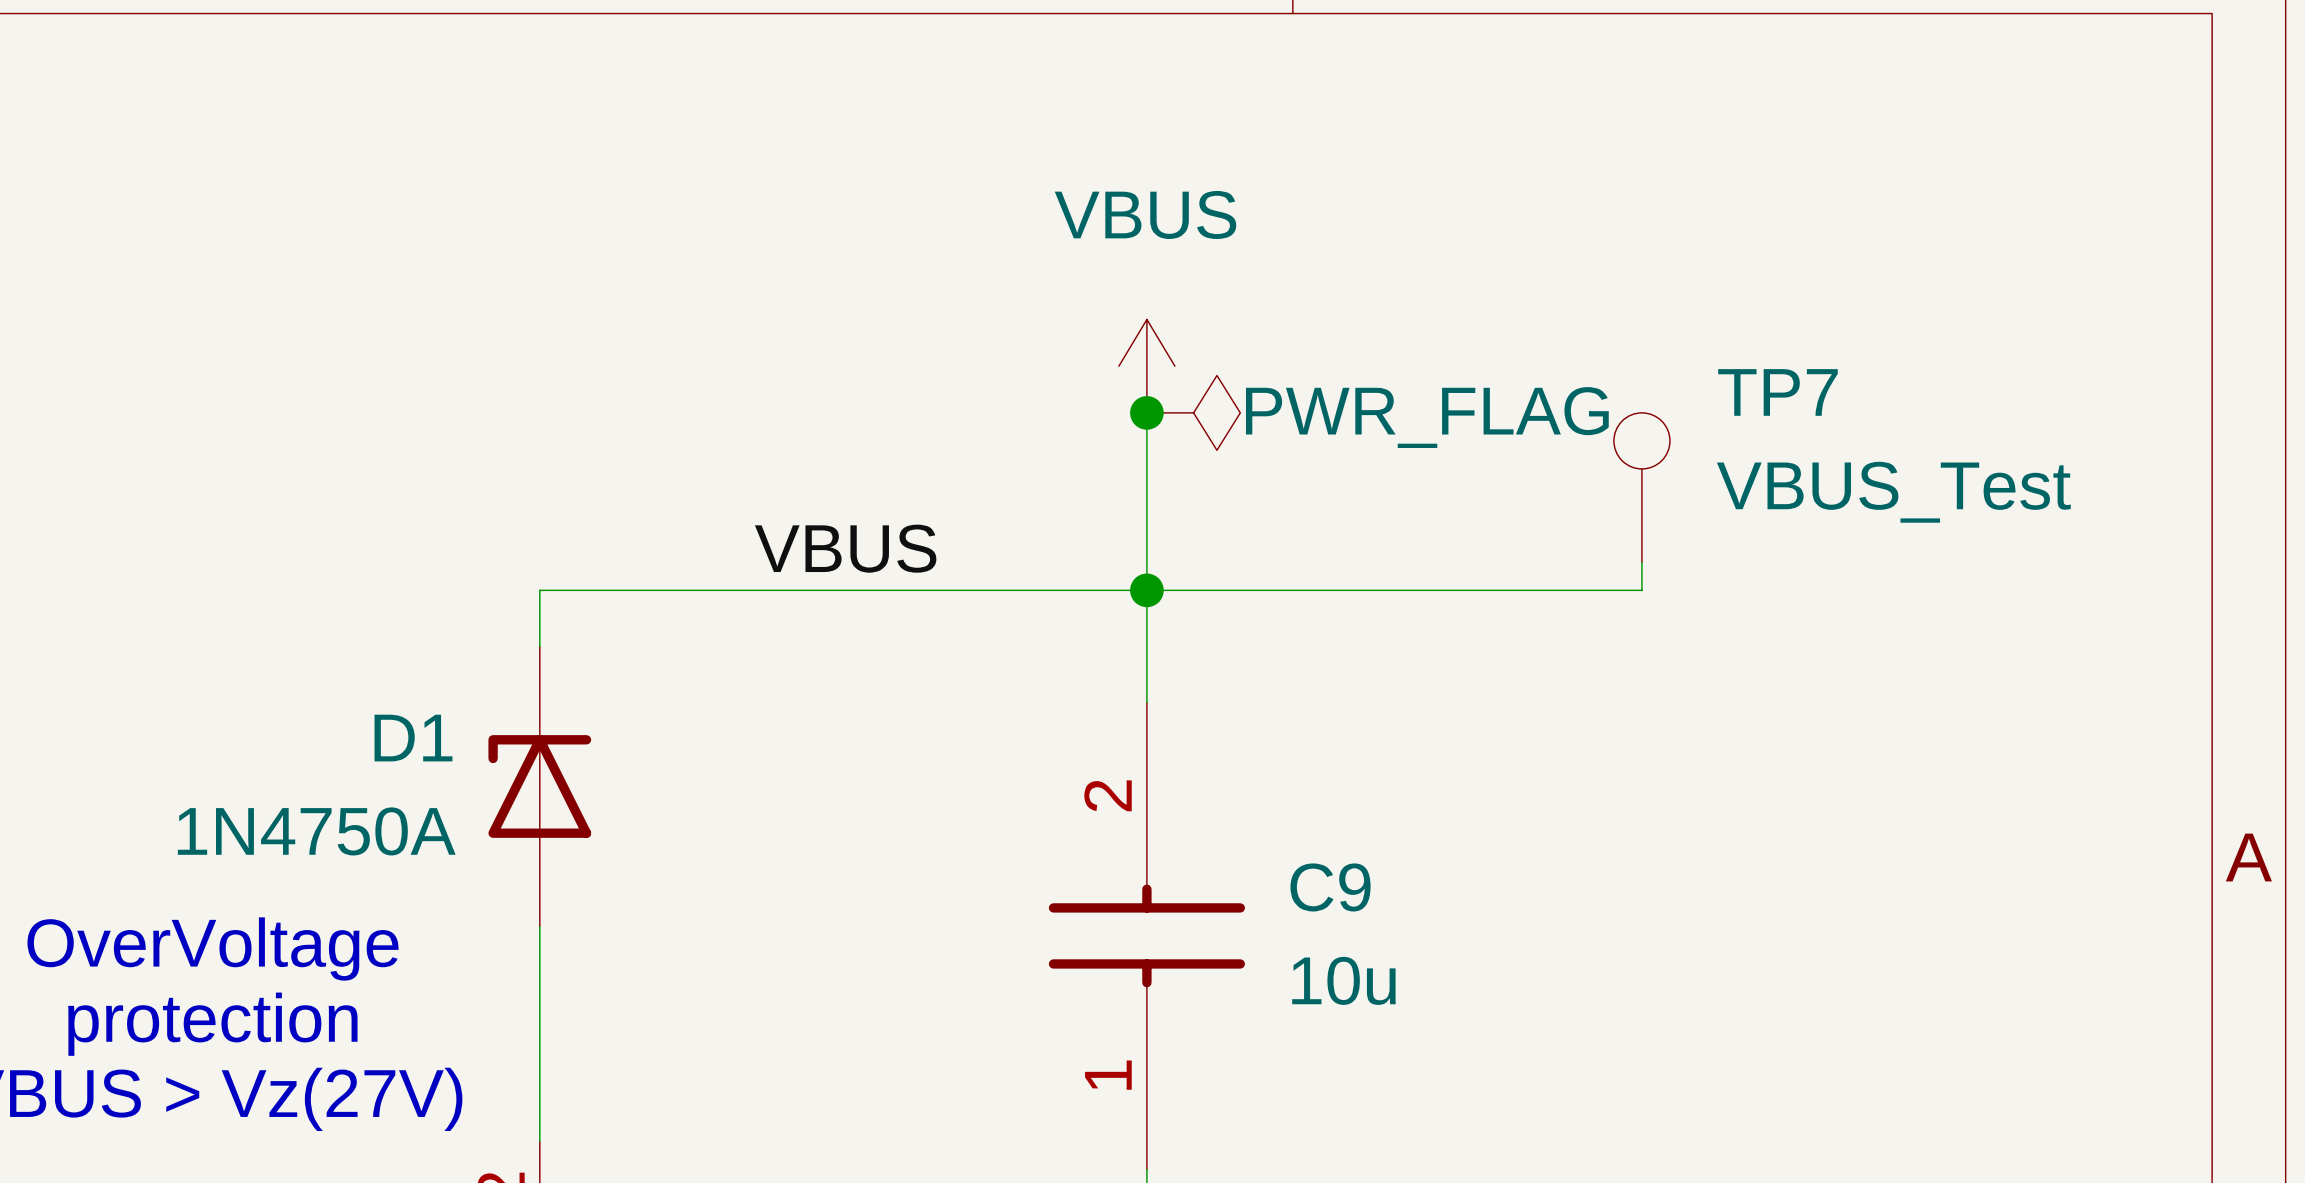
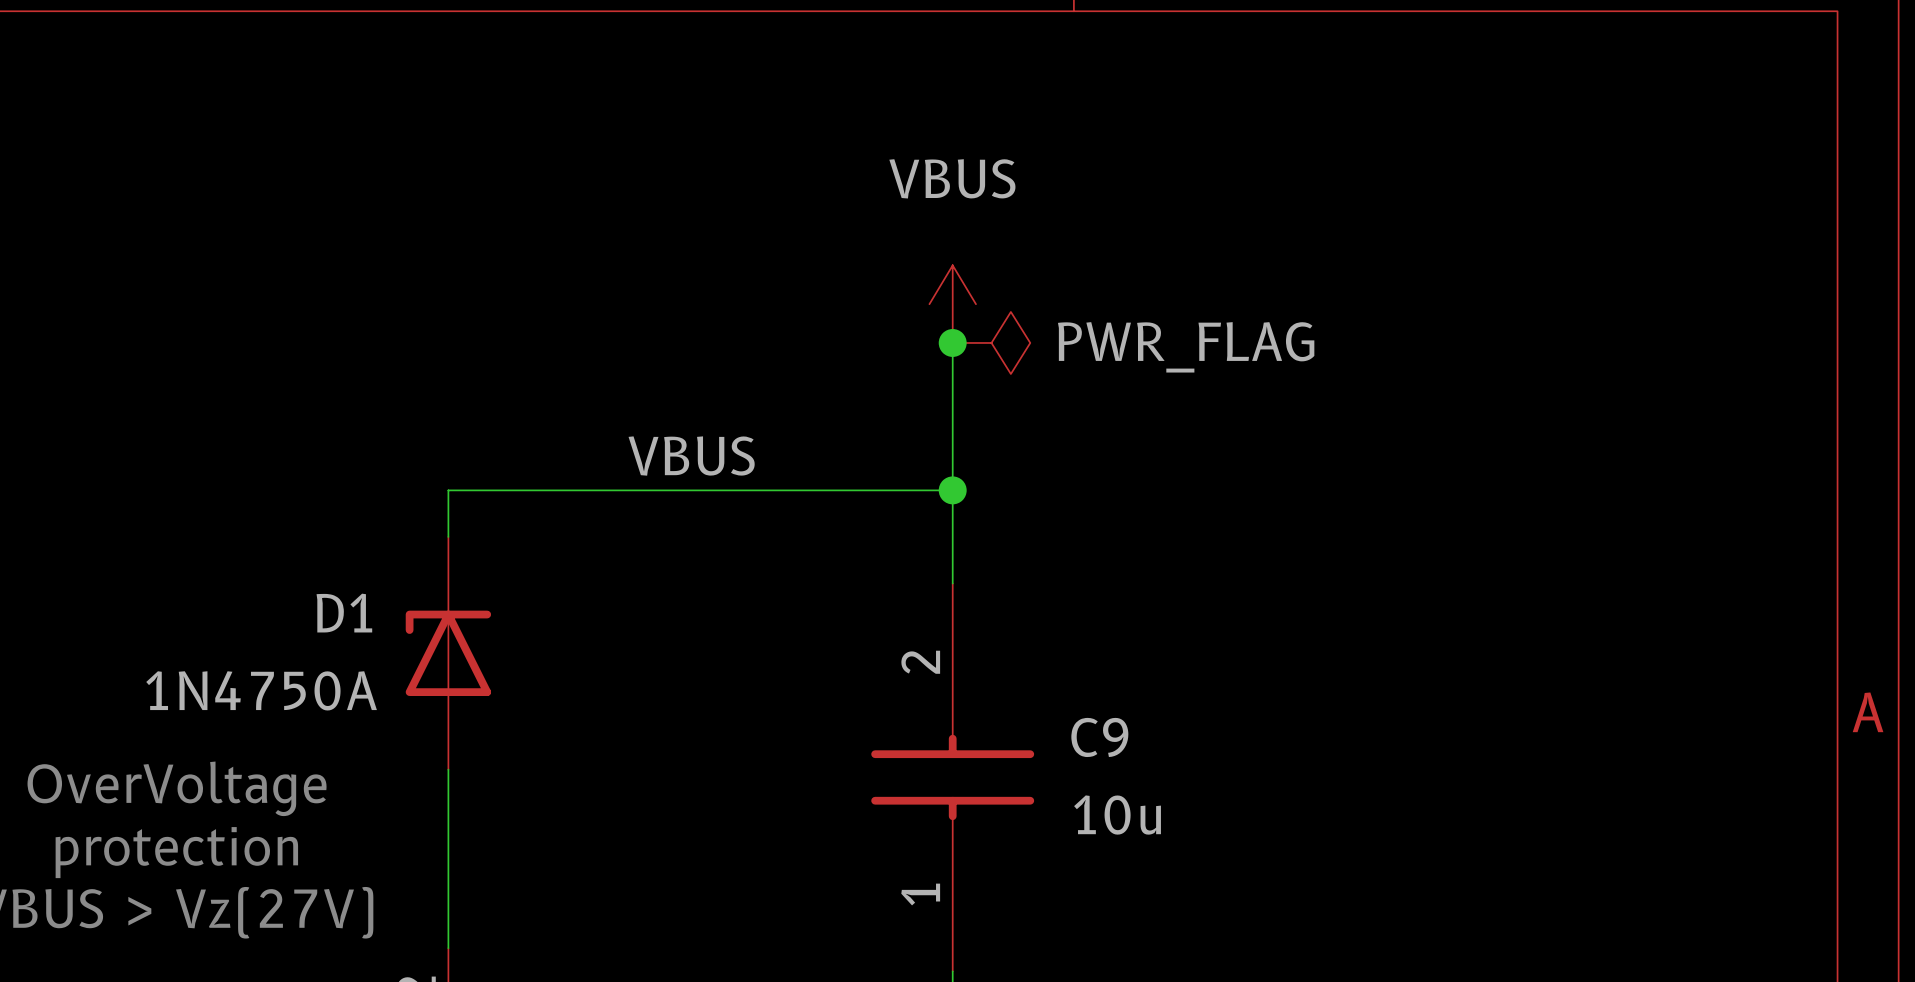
TP7: VBUS_Test (1641, 487) -> none
wire: (1641, 562) (1641, 590) (1146, 590) -> none

